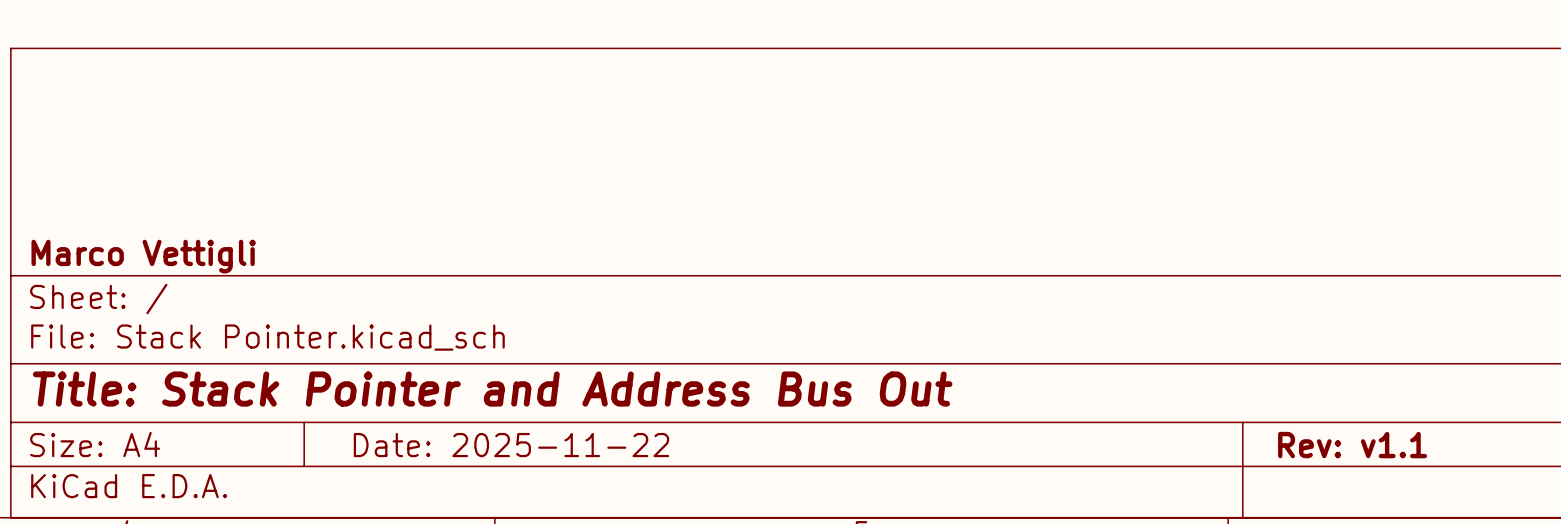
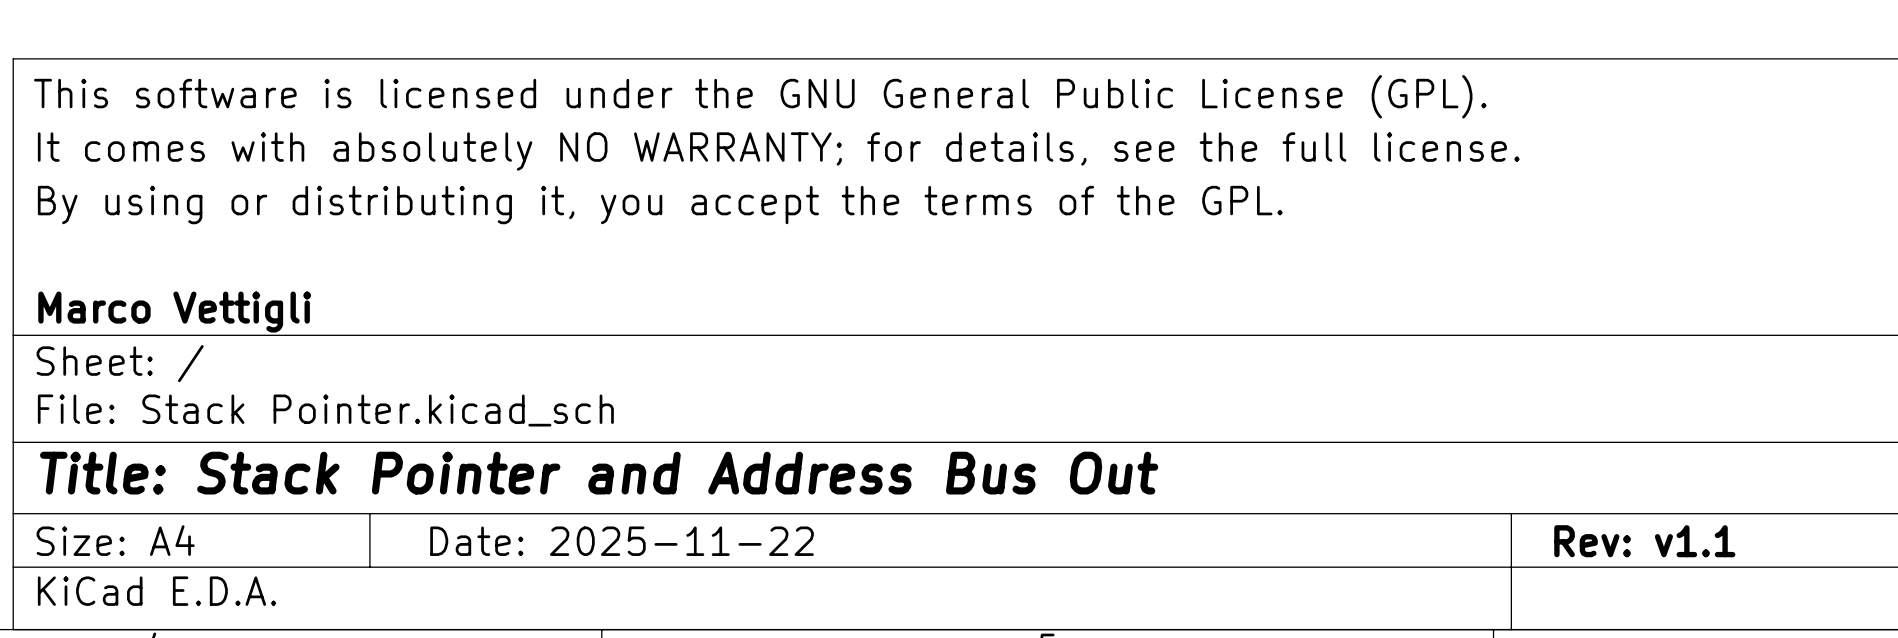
title block: none -> This software is licensed under the GNU General Public License (GPL). (760, 96)
title block: none -> It comes with absolutely NO WARRANTY; for details, see the full license. (778, 151)
title block: none -> By using or distributing it, you accept the terms of the GPL. (660, 205)

